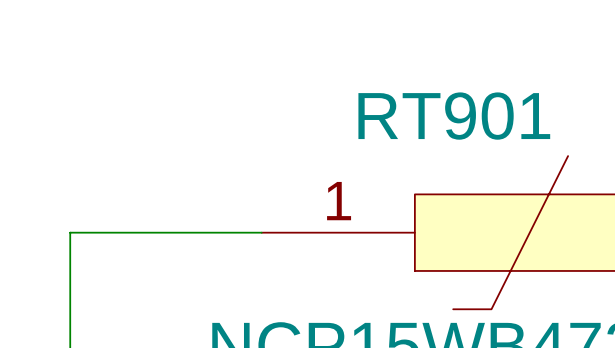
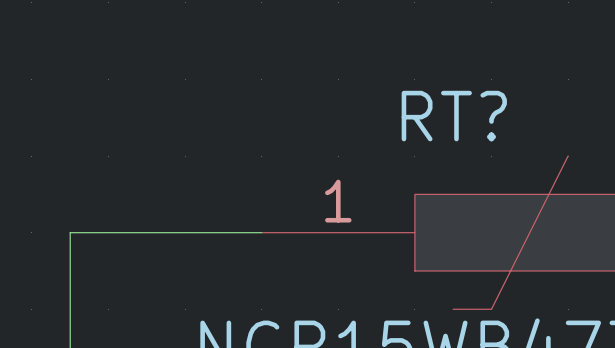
RT901 name: RT901 (454, 116) -> RT? (454, 116)

